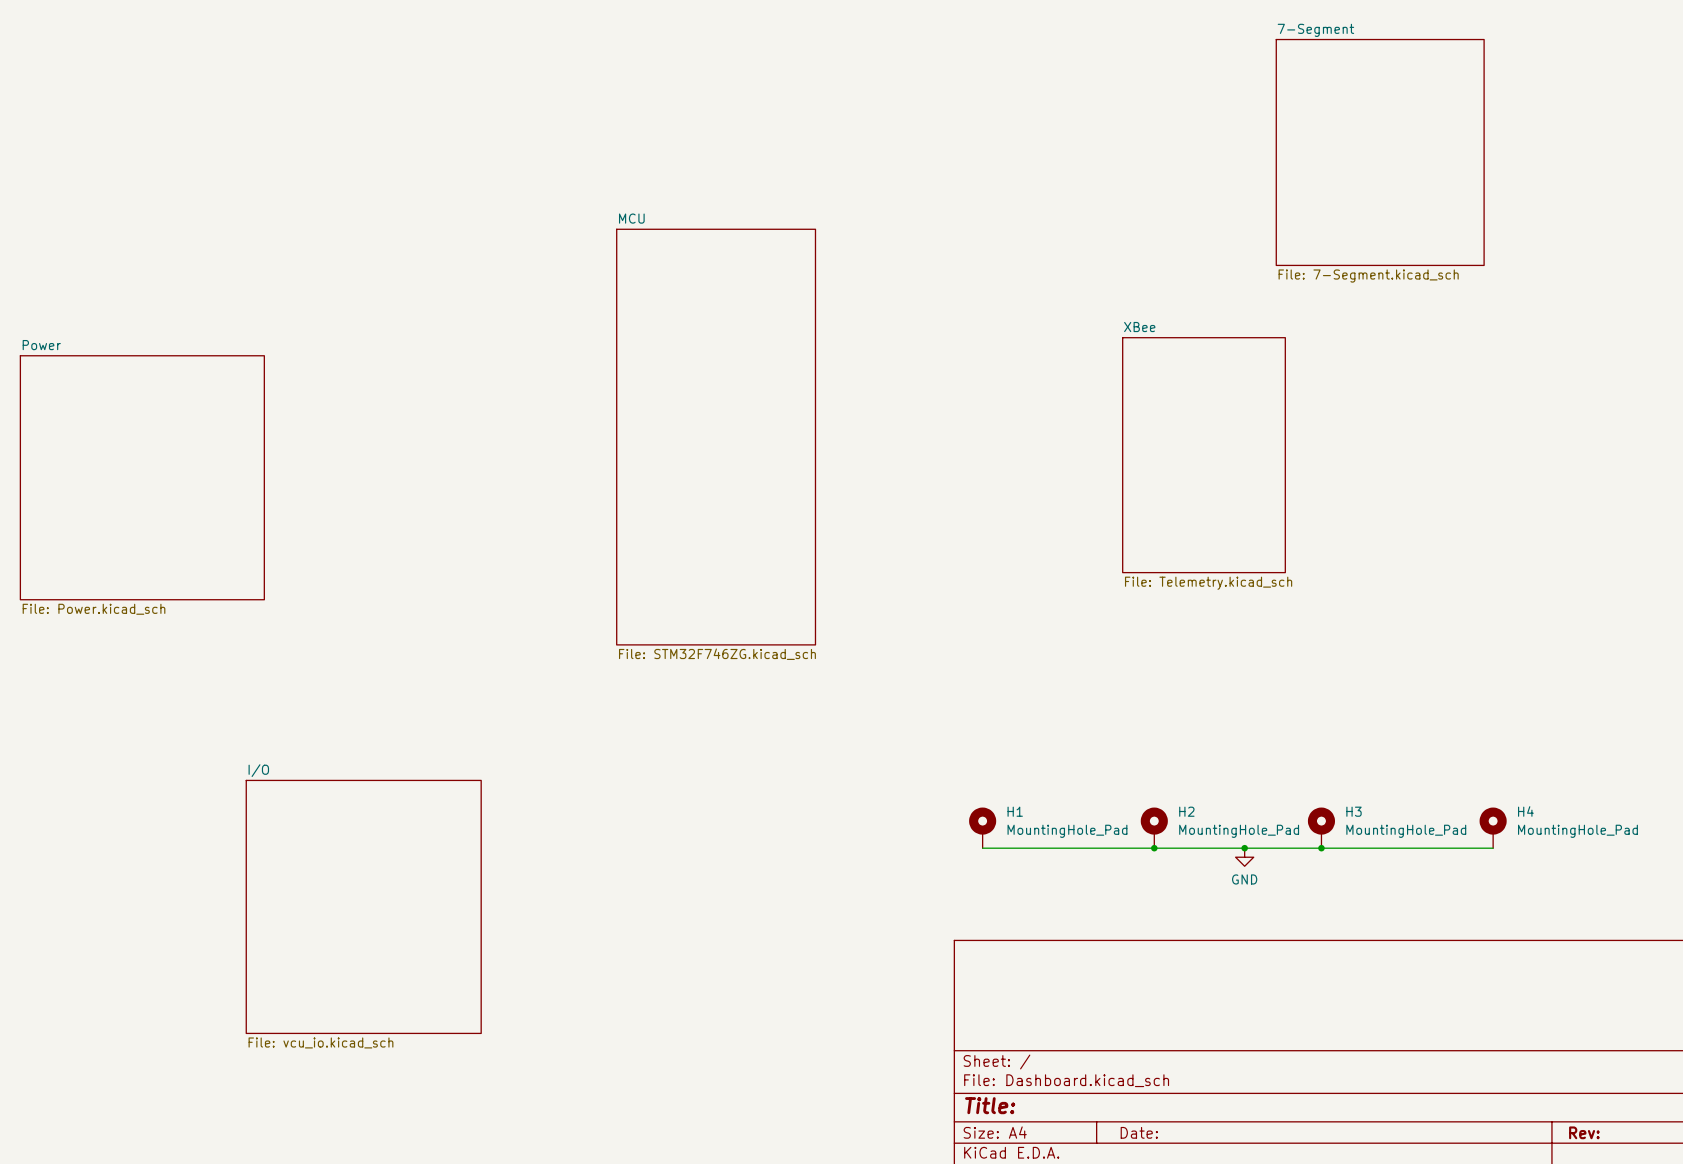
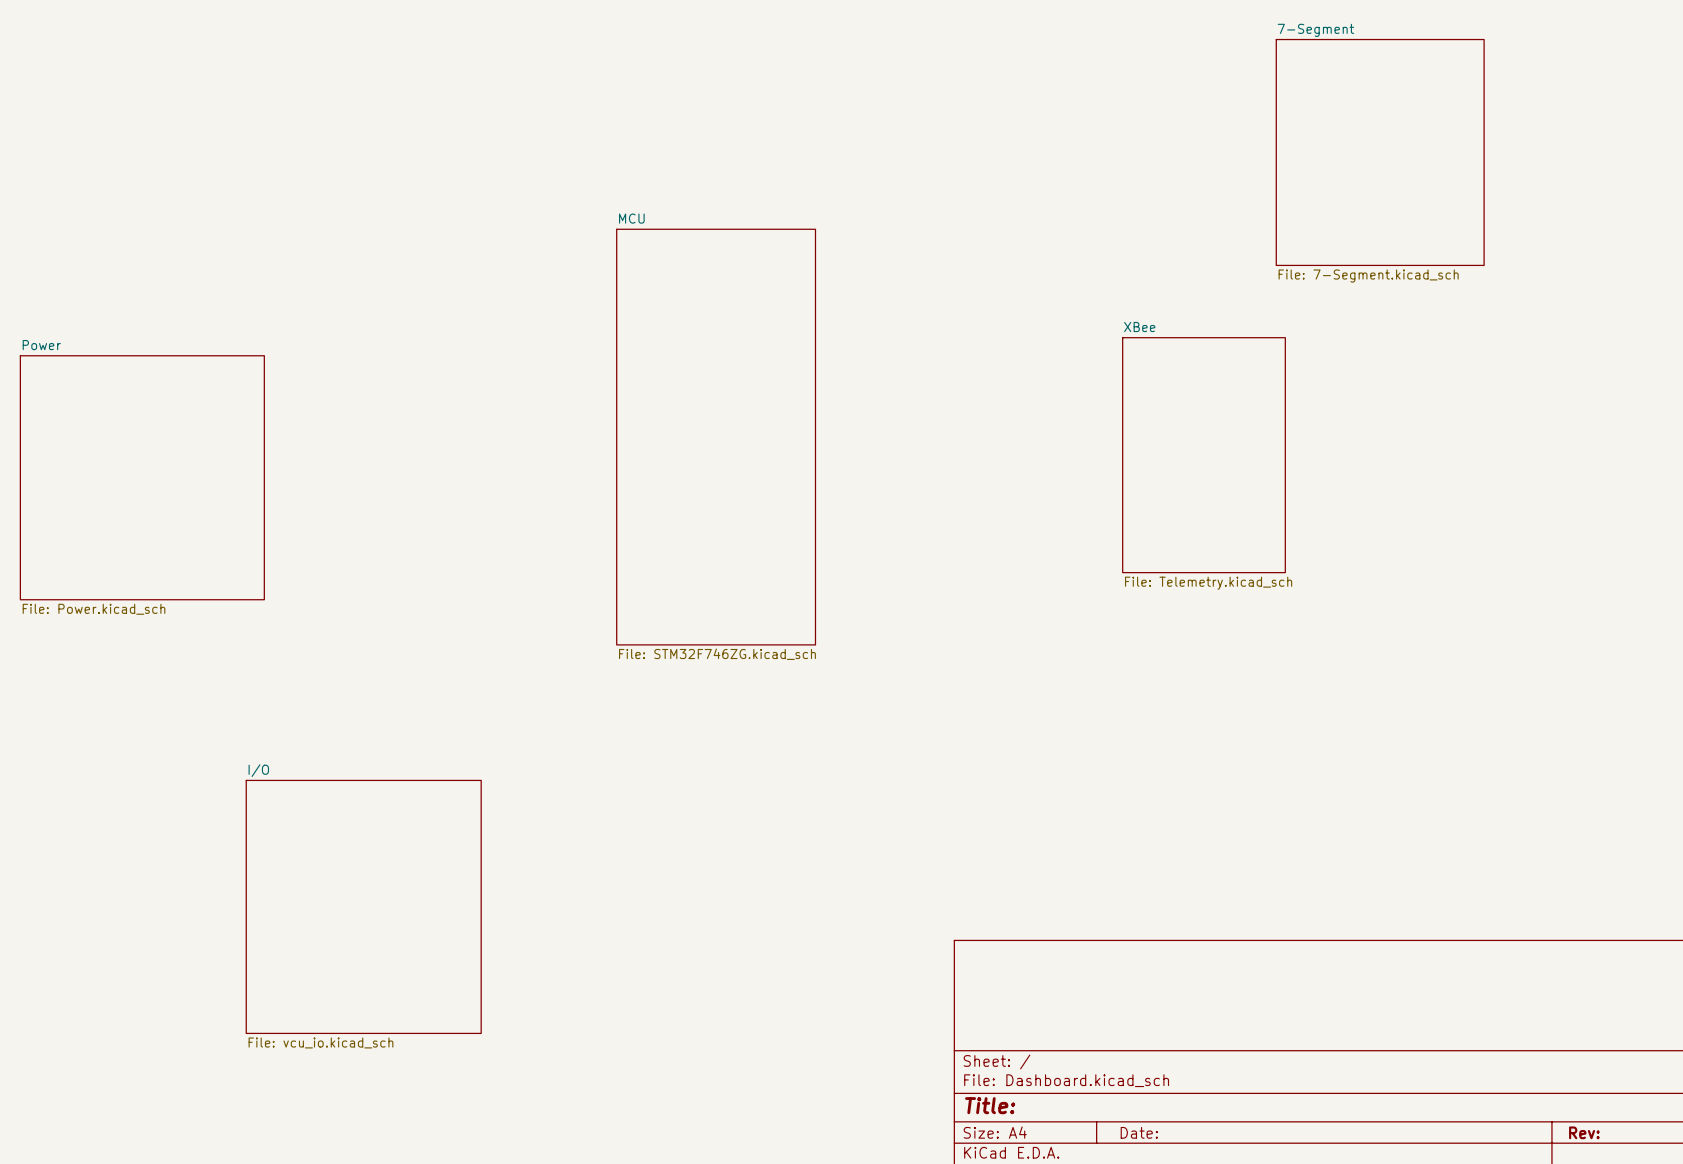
H1: MountingHole_Pad (982, 827) -> none
H2: MountingHole_Pad (1154, 827) -> none
H3: MountingHole_Pad (1321, 827) -> none
H4: MountingHole_Pad (1493, 827) -> none
wire: (982, 848) (1493, 848) -> none
junction: (1154, 848) -> none
junction: (1244, 848) -> none
junction: (1321, 848) -> none
power symbol: GND (1244, 857) -> none

